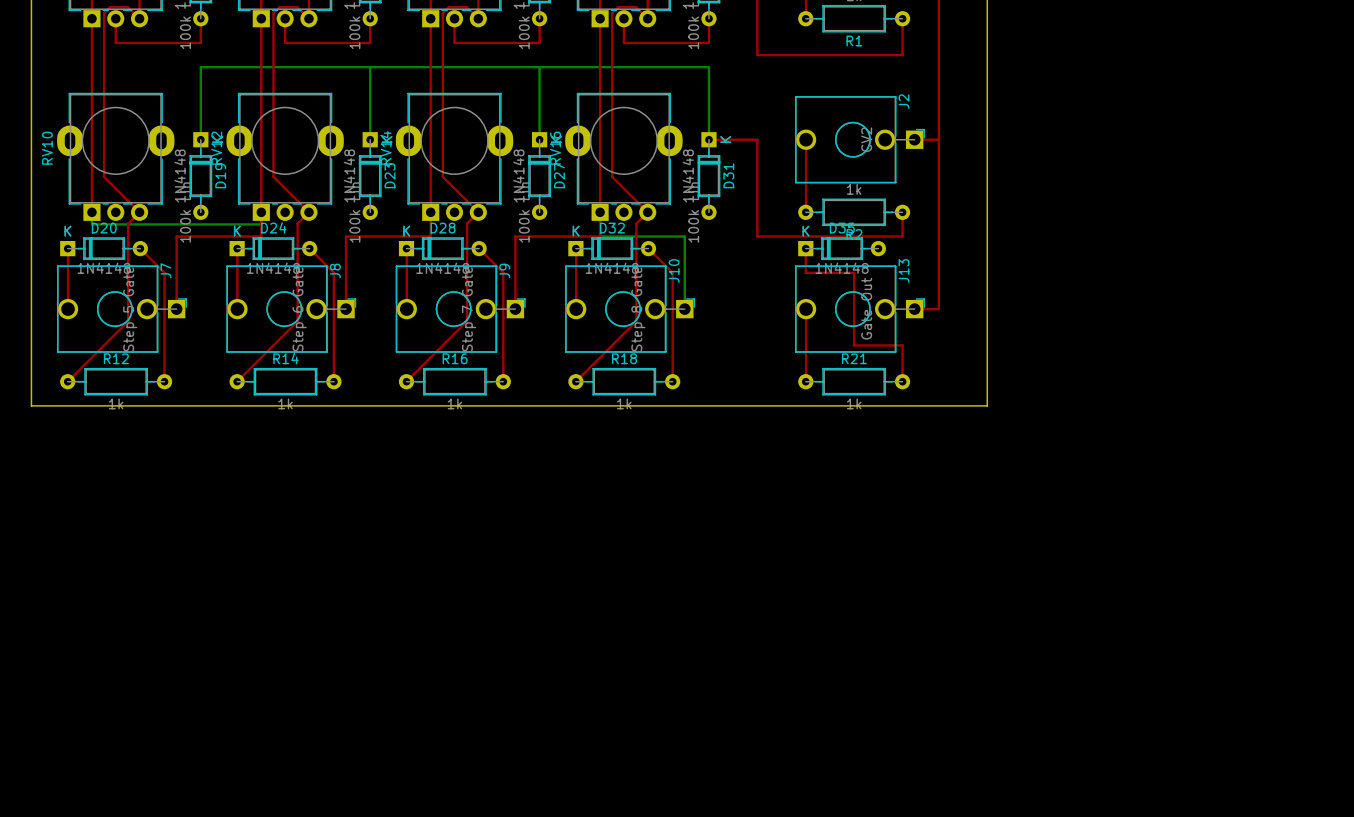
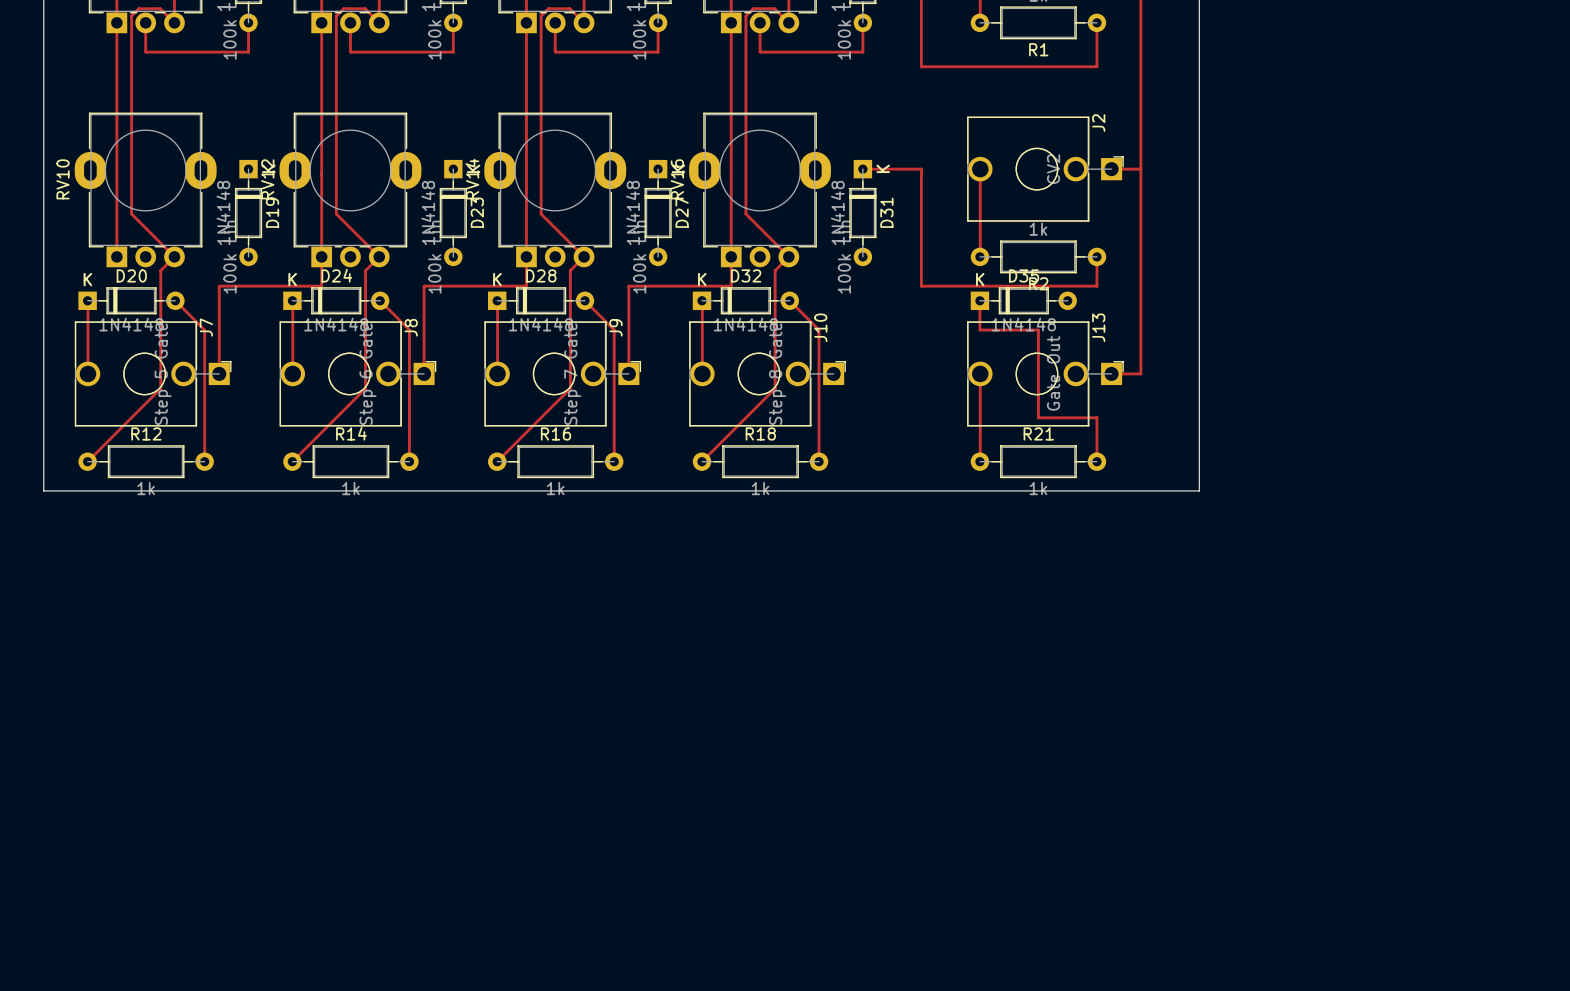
bottom track: (370, 67) (370, 139) -> none
bottom track: (539, 67) (539, 139) -> none
bottom track: (200, 139) (200, 67) (708, 67) (708, 139) -> none
bottom track: (91, 212) (93, 224) (261, 224) (261, 212) -> none
bottom track: (600, 212) (600, 236) (684, 236) (684, 309) -> none

